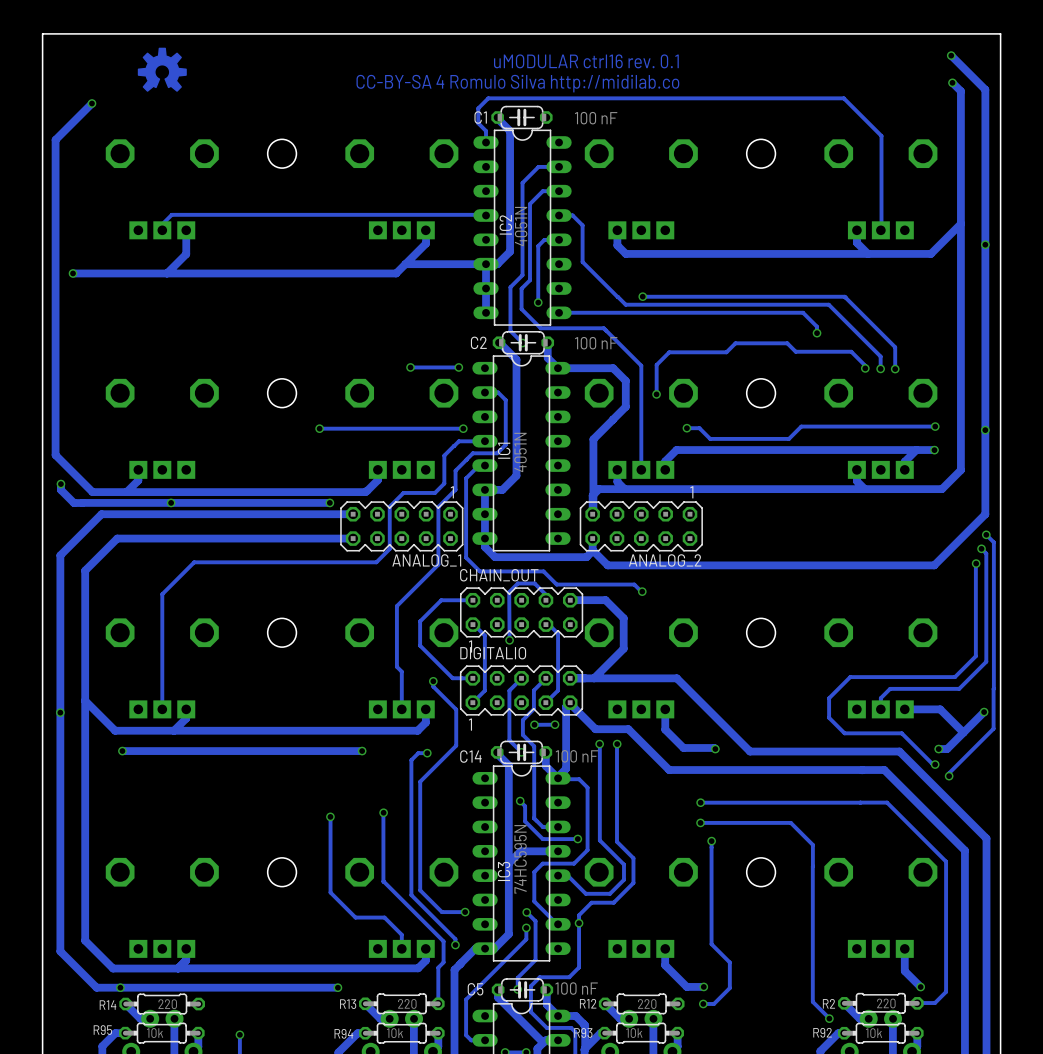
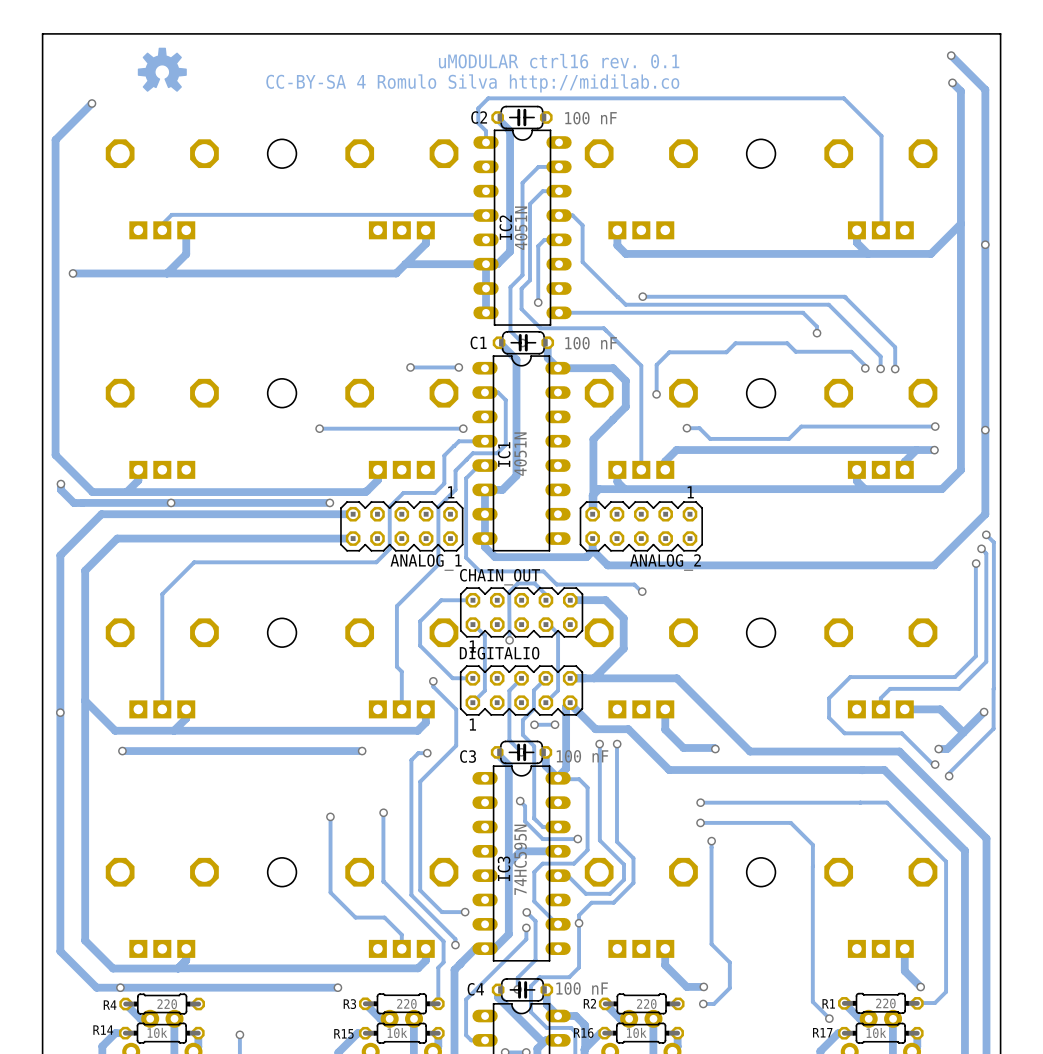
C1 name: C1 (480, 117) -> C2 (479, 117)
C2 name: C2 (478, 342) -> C1 (478, 342)
C14 name: C14 (470, 756) -> C3 (468, 756)
C5 name: C5 (475, 989) -> C4 (475, 989)
R12 name: R12 (588, 1003) -> R2 (589, 1003)
R2 name: R2 (828, 1003) -> R1 (828, 1003)
R13 name: R13 (348, 1004) -> R3 (349, 1004)
R14 name: R14 (108, 1005) -> R4 (110, 1005)
R95 name: R95 (102, 1030) -> R14 (103, 1030)
R93 name: R93 (583, 1032) -> R16 (583, 1032)
R92 name: R92 (822, 1032) -> R17 (822, 1032)
R94 name: R94 (343, 1033) -> R15 (343, 1033)

